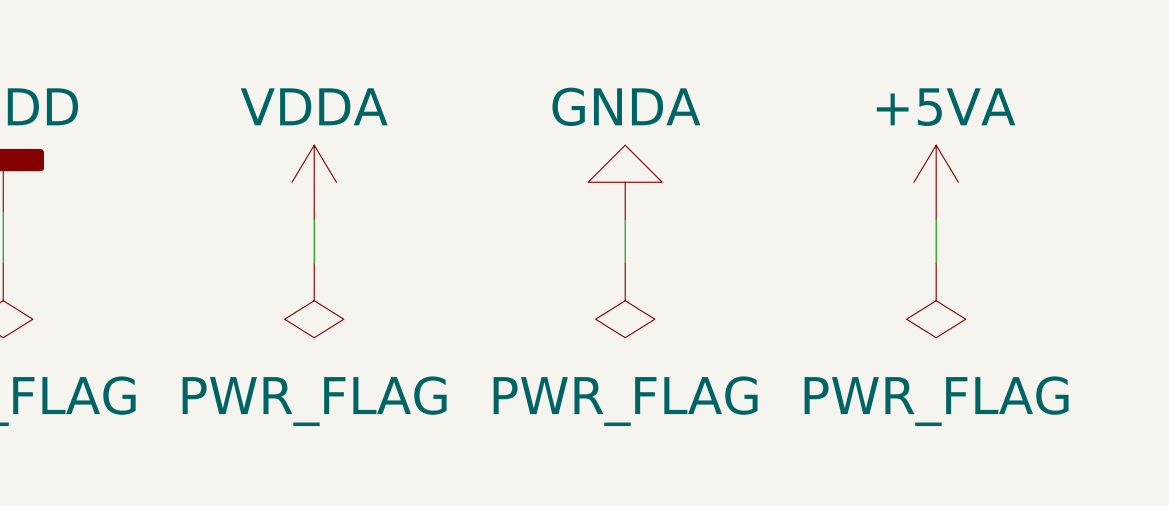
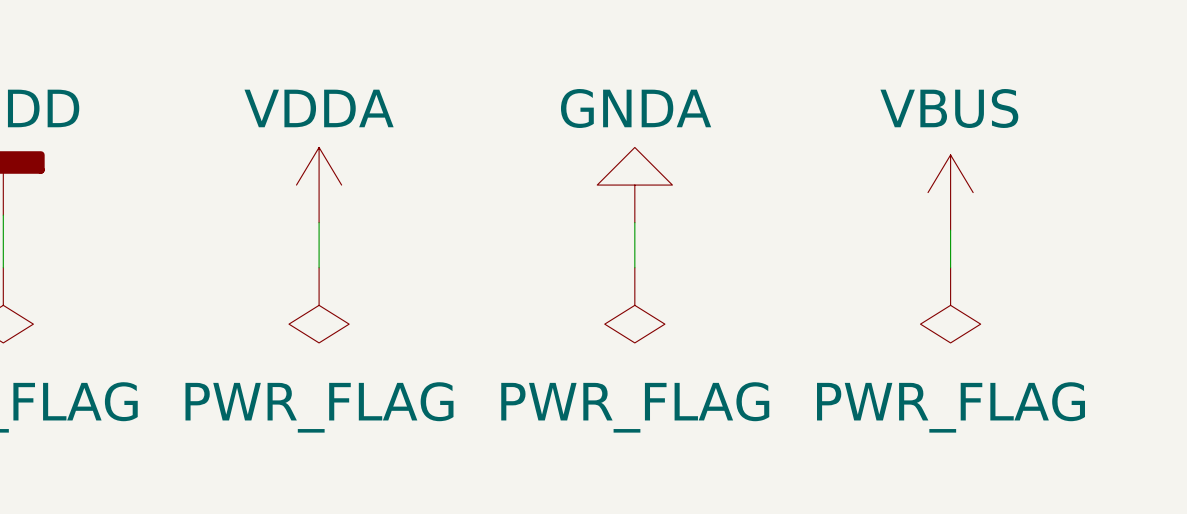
power symbol: +5VA (936, 182) -> VBUS (950, 192)

